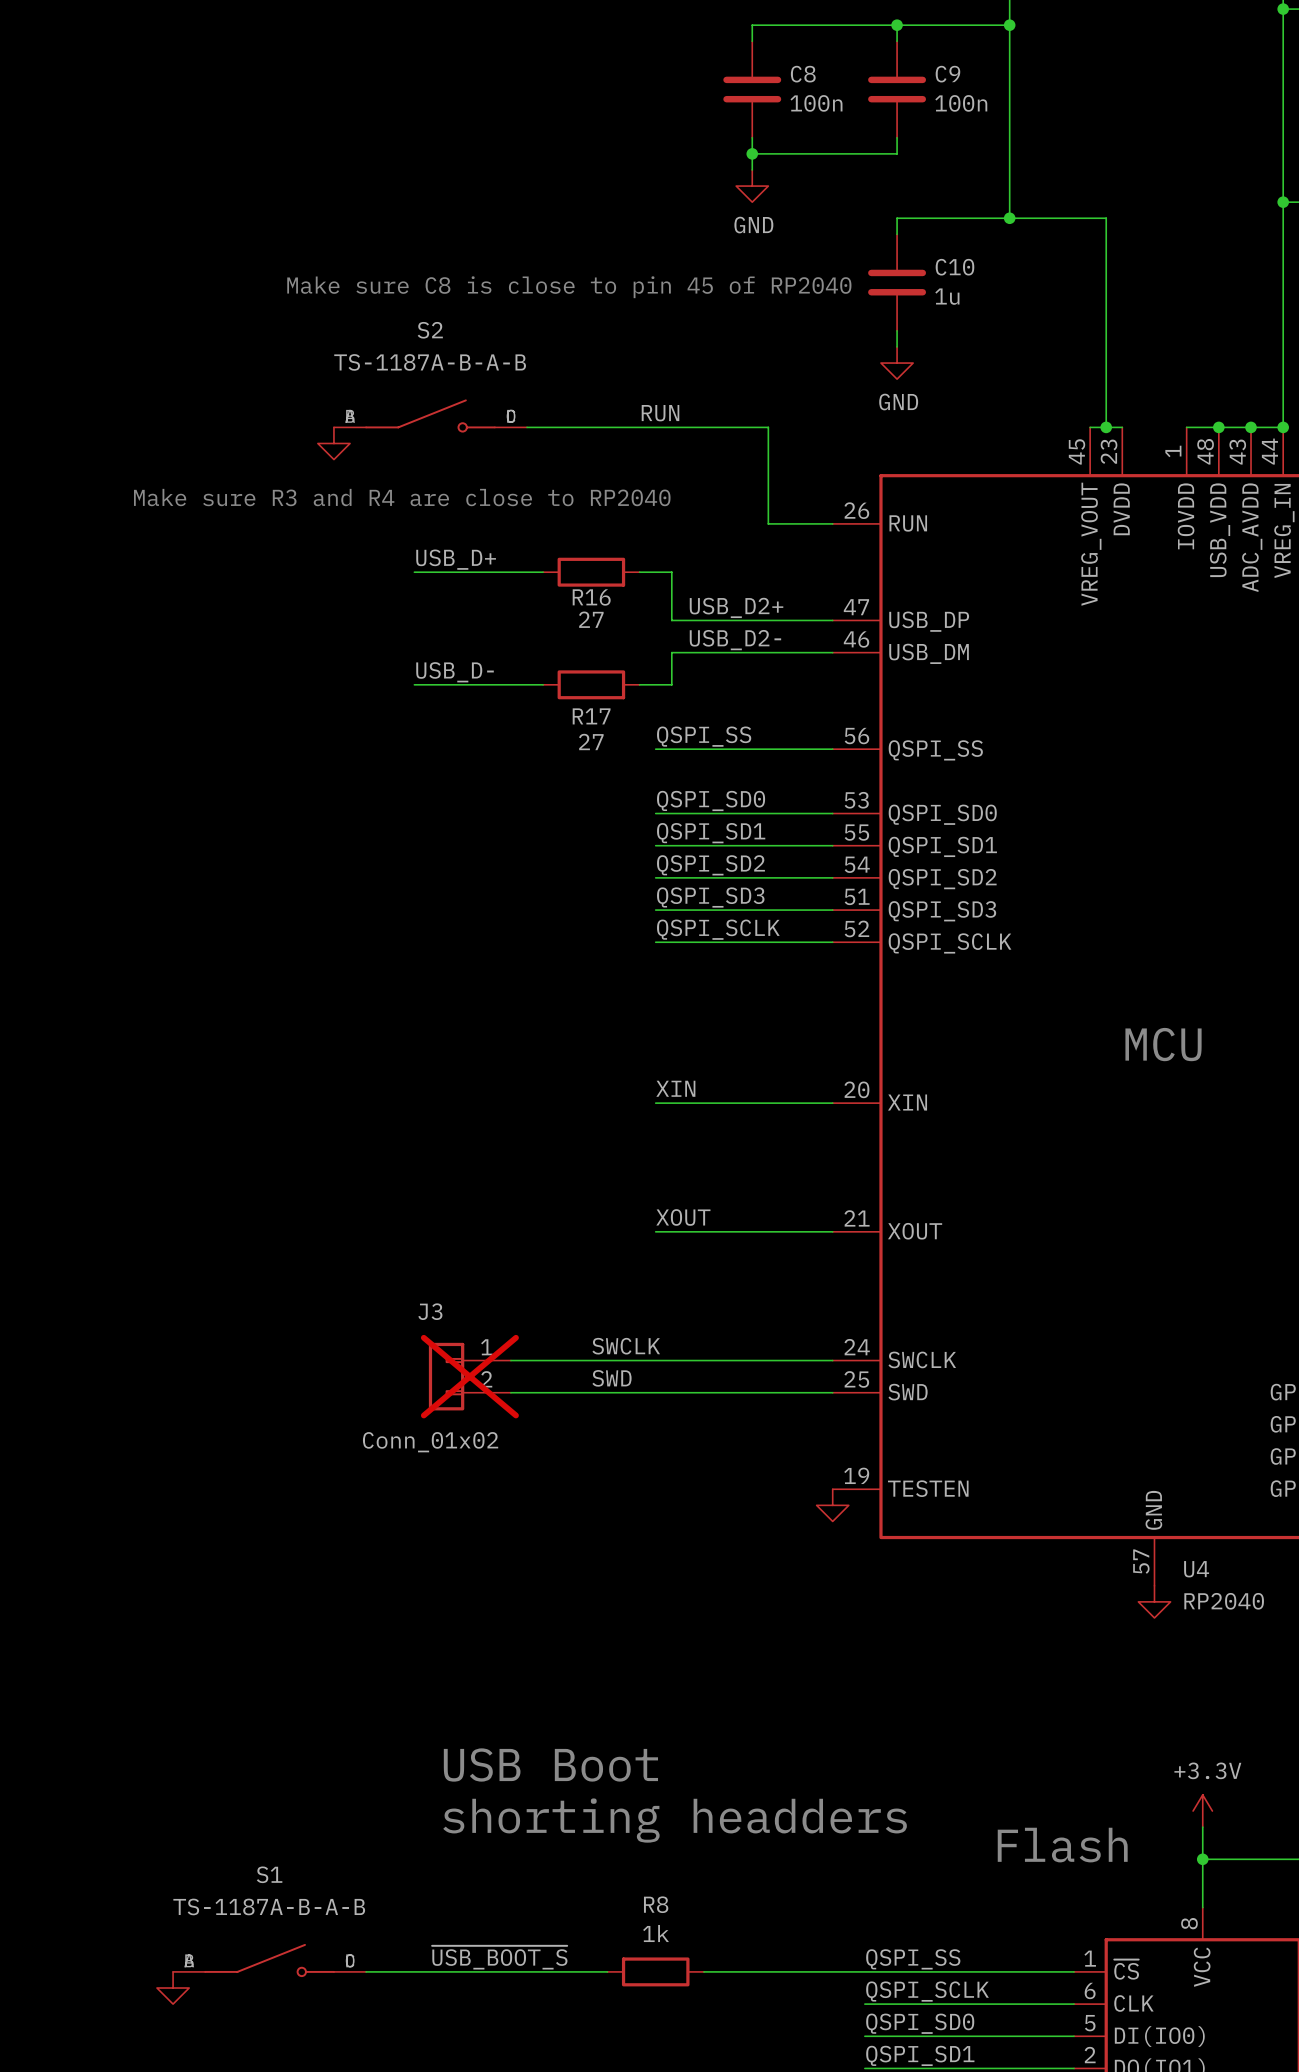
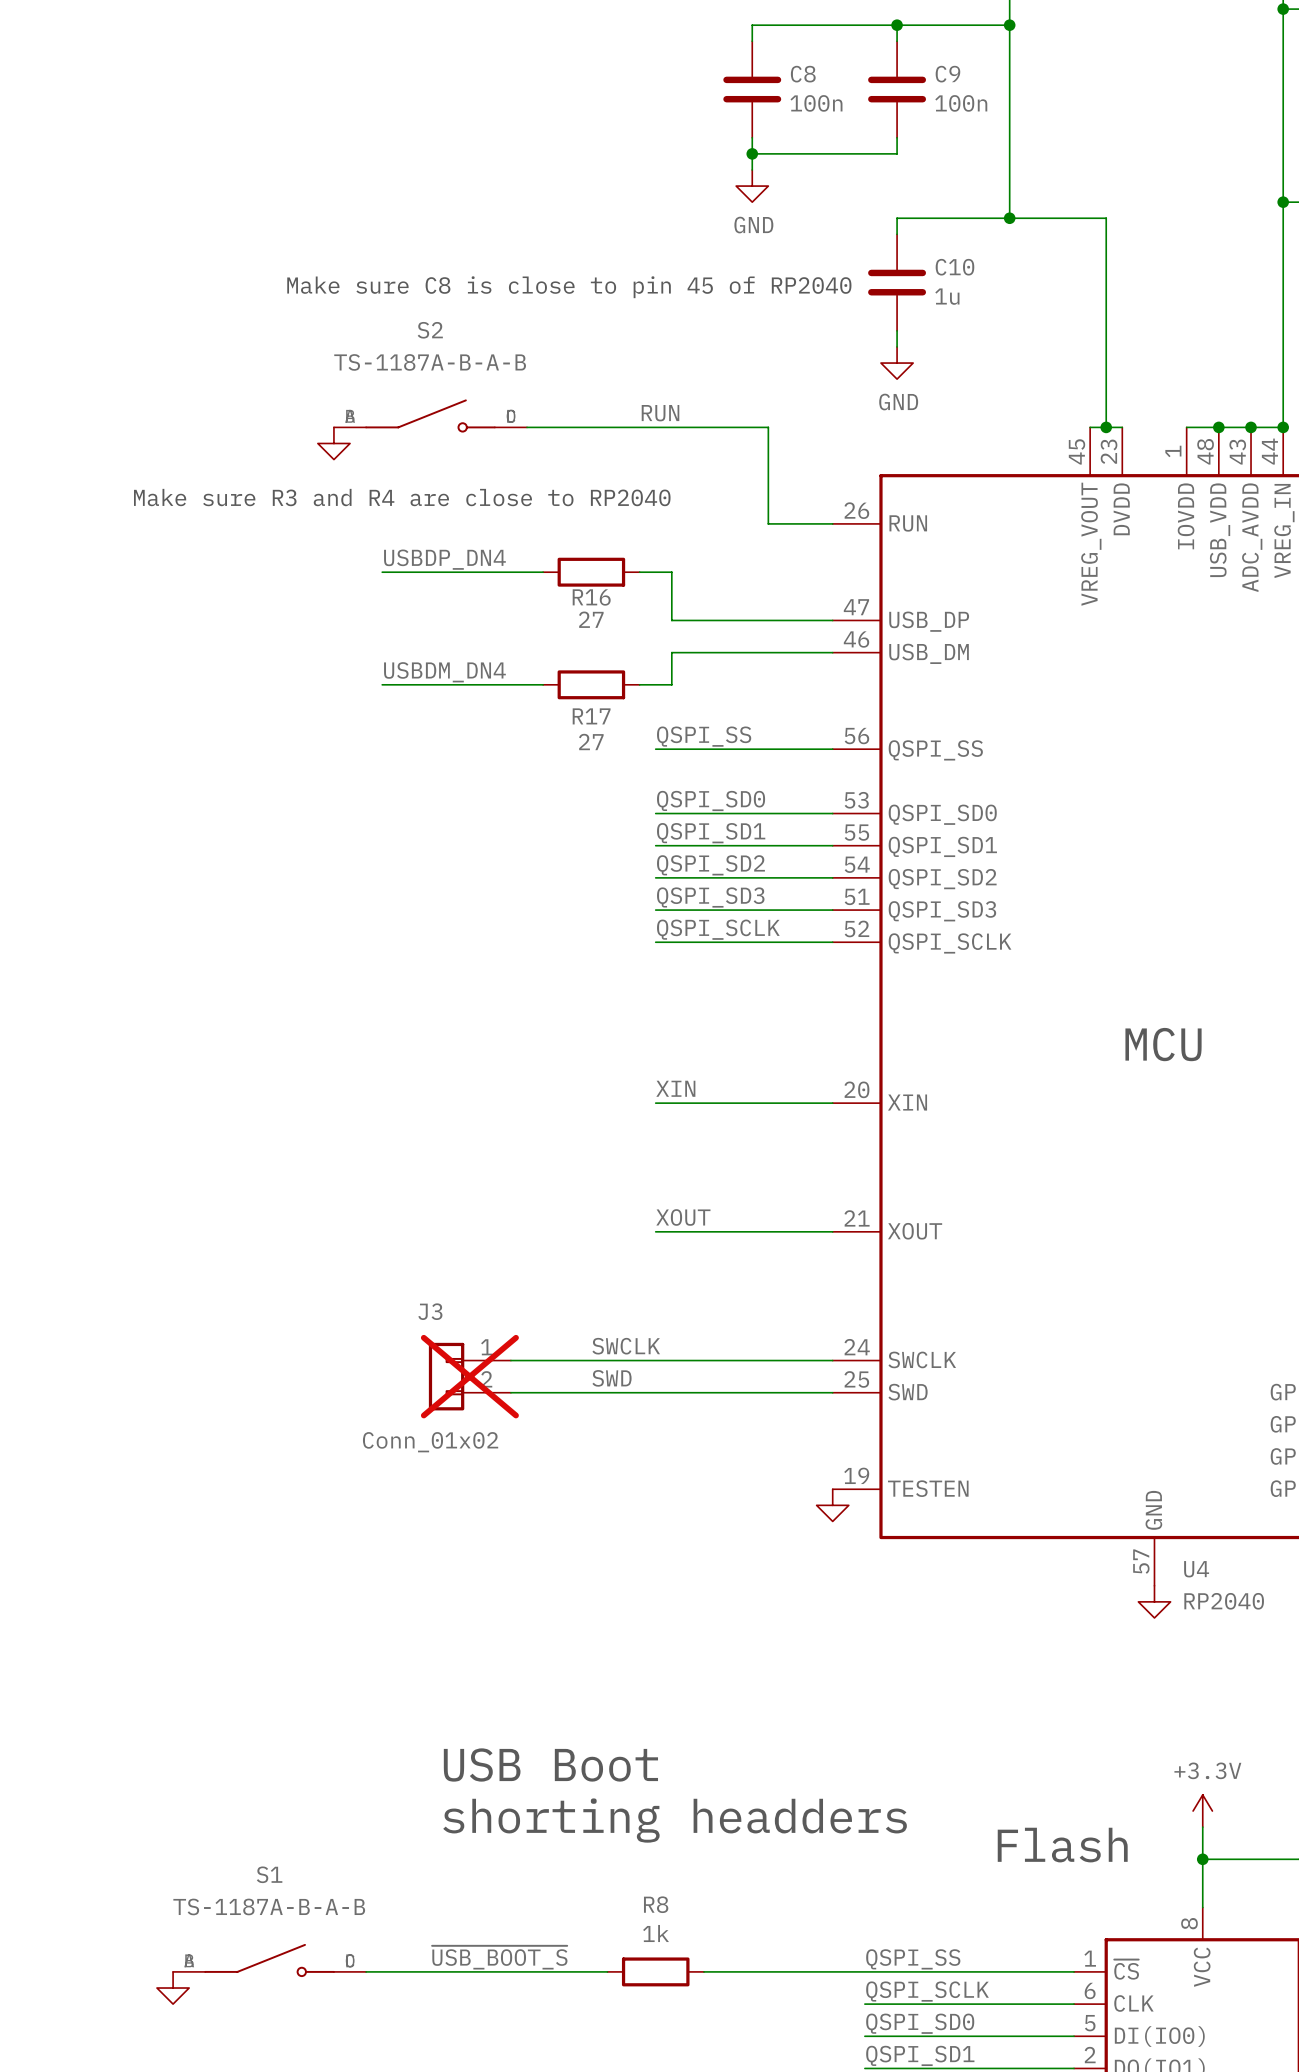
label: USB_D+ (456, 559) -> USBDP_DN4 (444, 559)
wire: none -> (382, 572) (414, 572)
label: USB_D2+ (736, 607) -> none
label: USB_D2- (735, 640) -> none
label: USB_D- (455, 672) -> USBDM_DN4 (444, 672)
wire: none -> (382, 684) (414, 684)

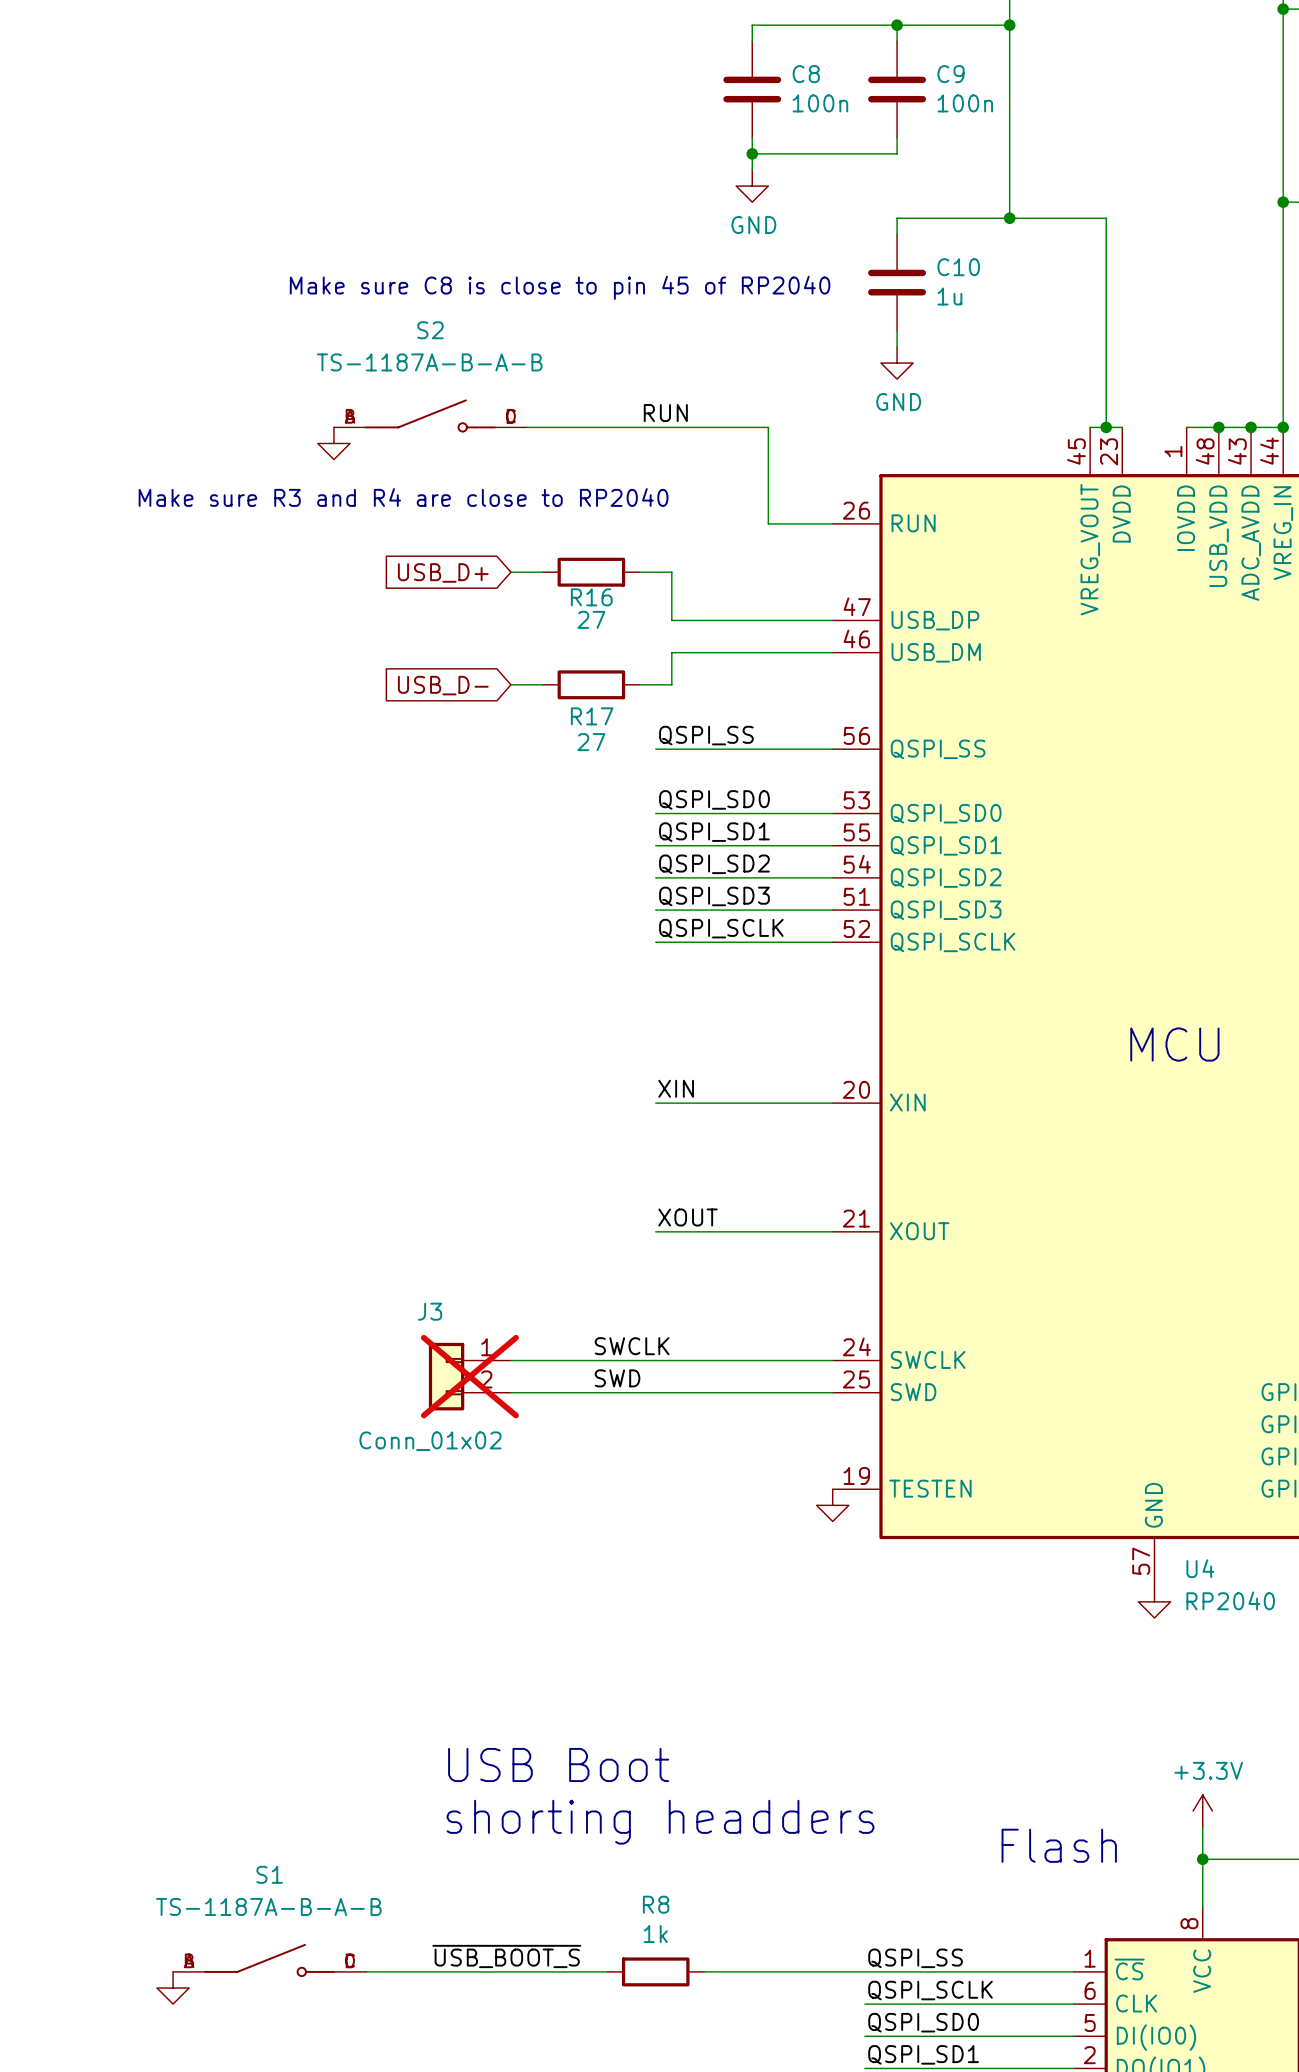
label: USBDP_DN4 (444, 559) -> none
wire: (382, 572) (510, 572) -> none
global label: none -> USB_D+ (443, 572)
label: USBDM_DN4 (444, 672) -> none
wire: (382, 684) (510, 684) -> none
global label: none -> USB_D- (443, 685)

